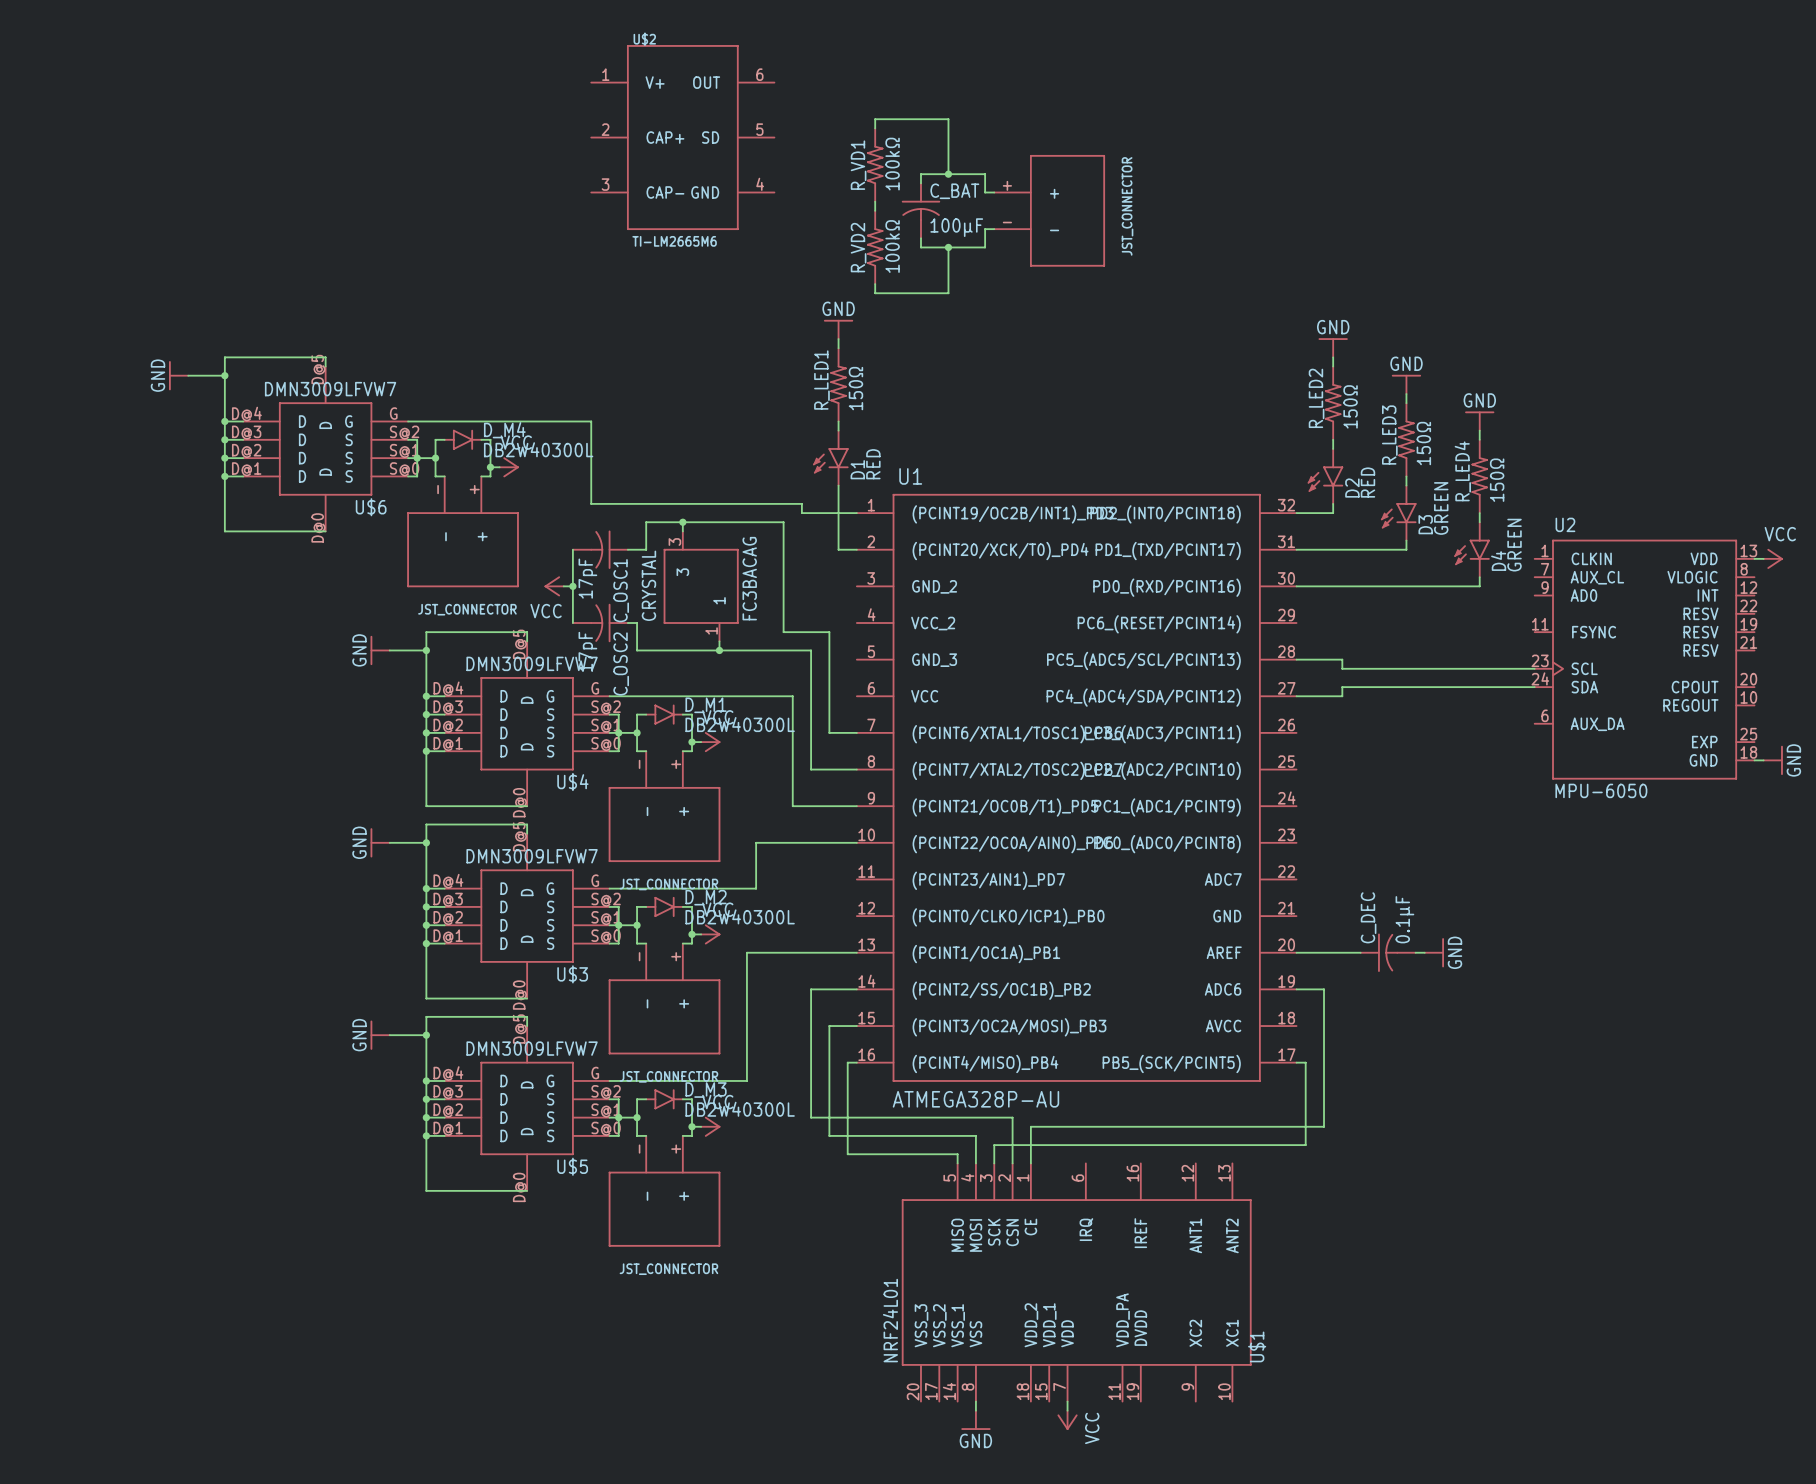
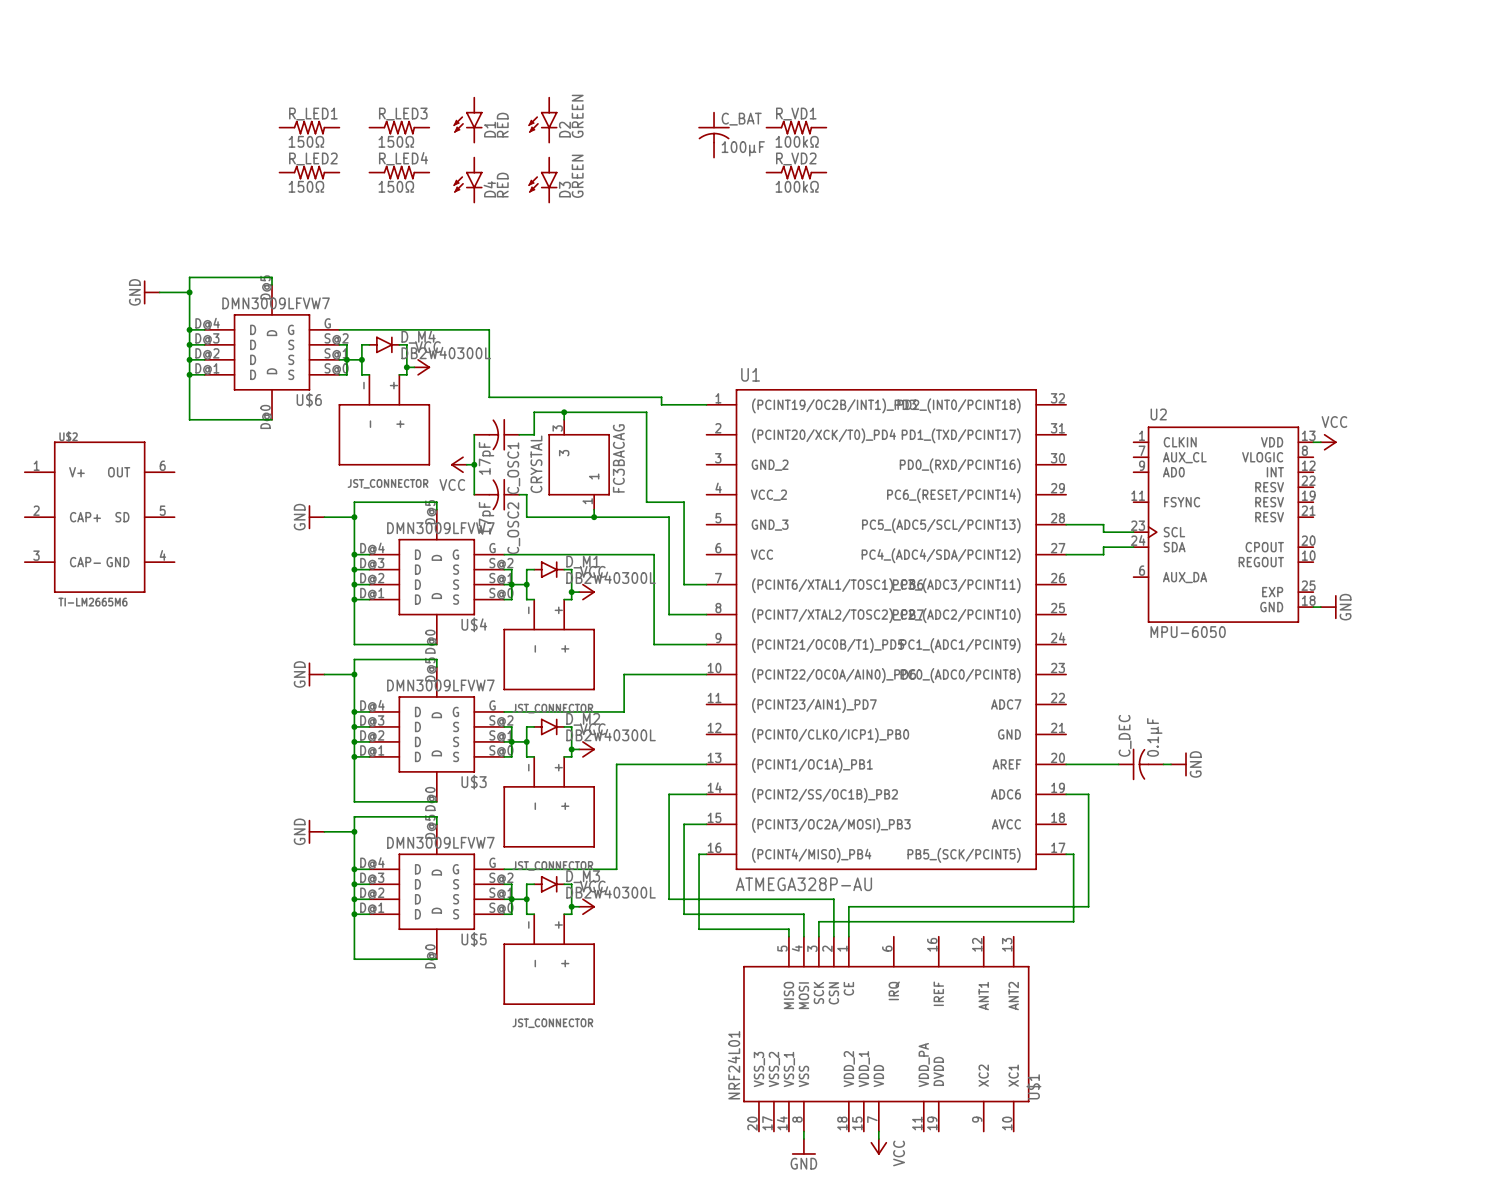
wire: (875, 128) (875, 119) (948, 119) (948, 174) -> none
U$2 position: (682, 137) -> (99, 517)
R_VD1 rotation: 0° (875, 165) -> 90° clockwise (796, 127)
R_VD1 position: (875, 165) -> (796, 127)
junction: (948, 174) -> none
wire: (920, 183) (920, 174) (985, 174) (985, 192) (994, 192) -> none
wire: (875, 201) (875, 210) -> none
C_BAT position: (920, 210) -> (714, 135)
part: (1049, 210) -> none
wire: (994, 229) (985, 229) (985, 247) (920, 247) (920, 238) -> none
R_VD2 rotation: 0° (875, 247) -> 90° clockwise (796, 172)
R_VD2 position: (875, 247) -> (796, 172)
wire: (948, 247) (948, 293) (875, 293) (875, 284) -> none
junction: (948, 247) -> none
power symbol: GND (838, 329) -> none
wire: (838, 339) (838, 348) -> none
power symbol: GND (1333, 347) -> none
wire: (1333, 357) (1333, 366) -> none
R_LED1 rotation: 0° (838, 384) -> 90° clockwise (309, 127)
R_LED1 position: (838, 384) -> (309, 127)
power symbol: GND (1406, 384) -> none
wire: (1406, 394) (1406, 403) -> none
R_LED2 rotation: 0° (1333, 403) -> 90° clockwise (309, 172)
R_LED2 position: (1333, 403) -> (309, 172)
wire: (838, 421) (838, 430) -> none
power symbol: GND (1479, 421) -> none
wire: (1479, 430) (1479, 439) -> none
wire: (1333, 439) (1333, 448) -> none
R_LED3 rotation: 0° (1406, 439) -> 90° clockwise (399, 127)
R_LED3 position: (1406, 439) -> (399, 127)
D1 position: (830, 458) -> (468, 120)
D2 position: (1325, 476) -> (542, 120)
wire: (1406, 476) (1406, 485) -> none
R_LED4 rotation: 0° (1479, 476) -> 90° clockwise (399, 172)
R_LED4 position: (1479, 476) -> (399, 172)
D2 value: RED (1367, 482) -> GREEN (577, 116)
wire: (838, 485) (838, 549) (856, 549) -> none
wire: (1333, 503) (1333, 513) (1296, 513) -> none
D3 position: (1398, 513) -> (542, 180)
wire: (1479, 513) (1479, 522) -> none
wire: (1406, 540) (1406, 549) (1296, 549) -> none
D4 value: GREEN (1514, 545) -> RED (502, 185)
D4 position: (1472, 549) -> (468, 180)
wire: (1754, 558) (1763, 558) -> (1313, 442) (1320, 442)
power symbol position: VCC (1773, 558) -> VCC (1328, 442)
wire: (1479, 577) (1479, 586) (1296, 586) -> none
U2 position: (1644, 659) -> (1223, 524)
wire: (1378, 668) (1534, 668) -> none
wire: (1378, 687) (1534, 687) -> none
wire: (1754, 760) (1763, 760) -> (1313, 607) (1320, 607)
power symbol position: GND (1773, 760) -> GND (1328, 607)

